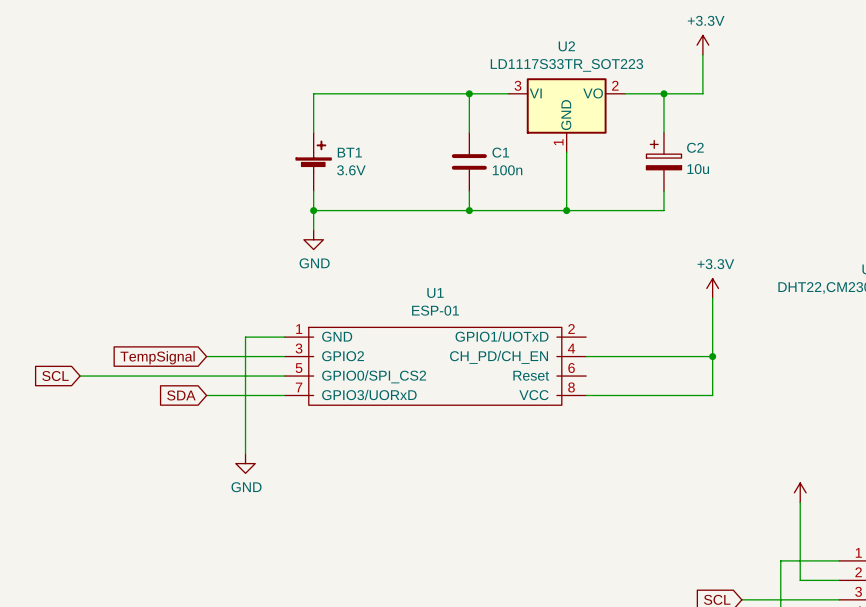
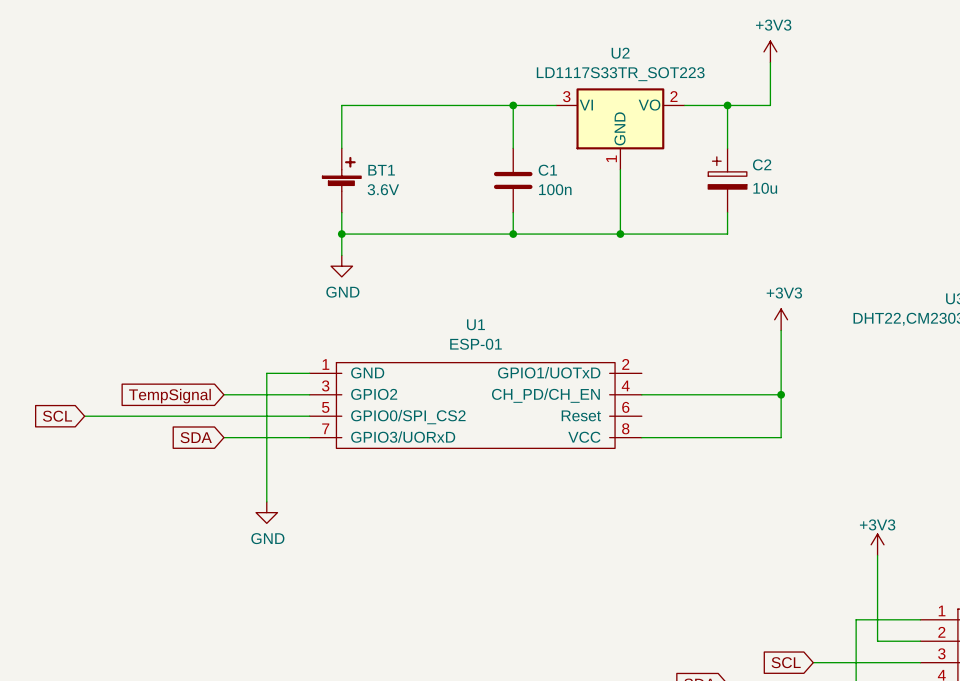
power symbol: +3.3V (702, 45) -> +3V3 (770, 51)
power symbol: +3.3V (712, 288) -> +3V3 (781, 319)
power symbol text: none -> +3V3 (877, 524)

